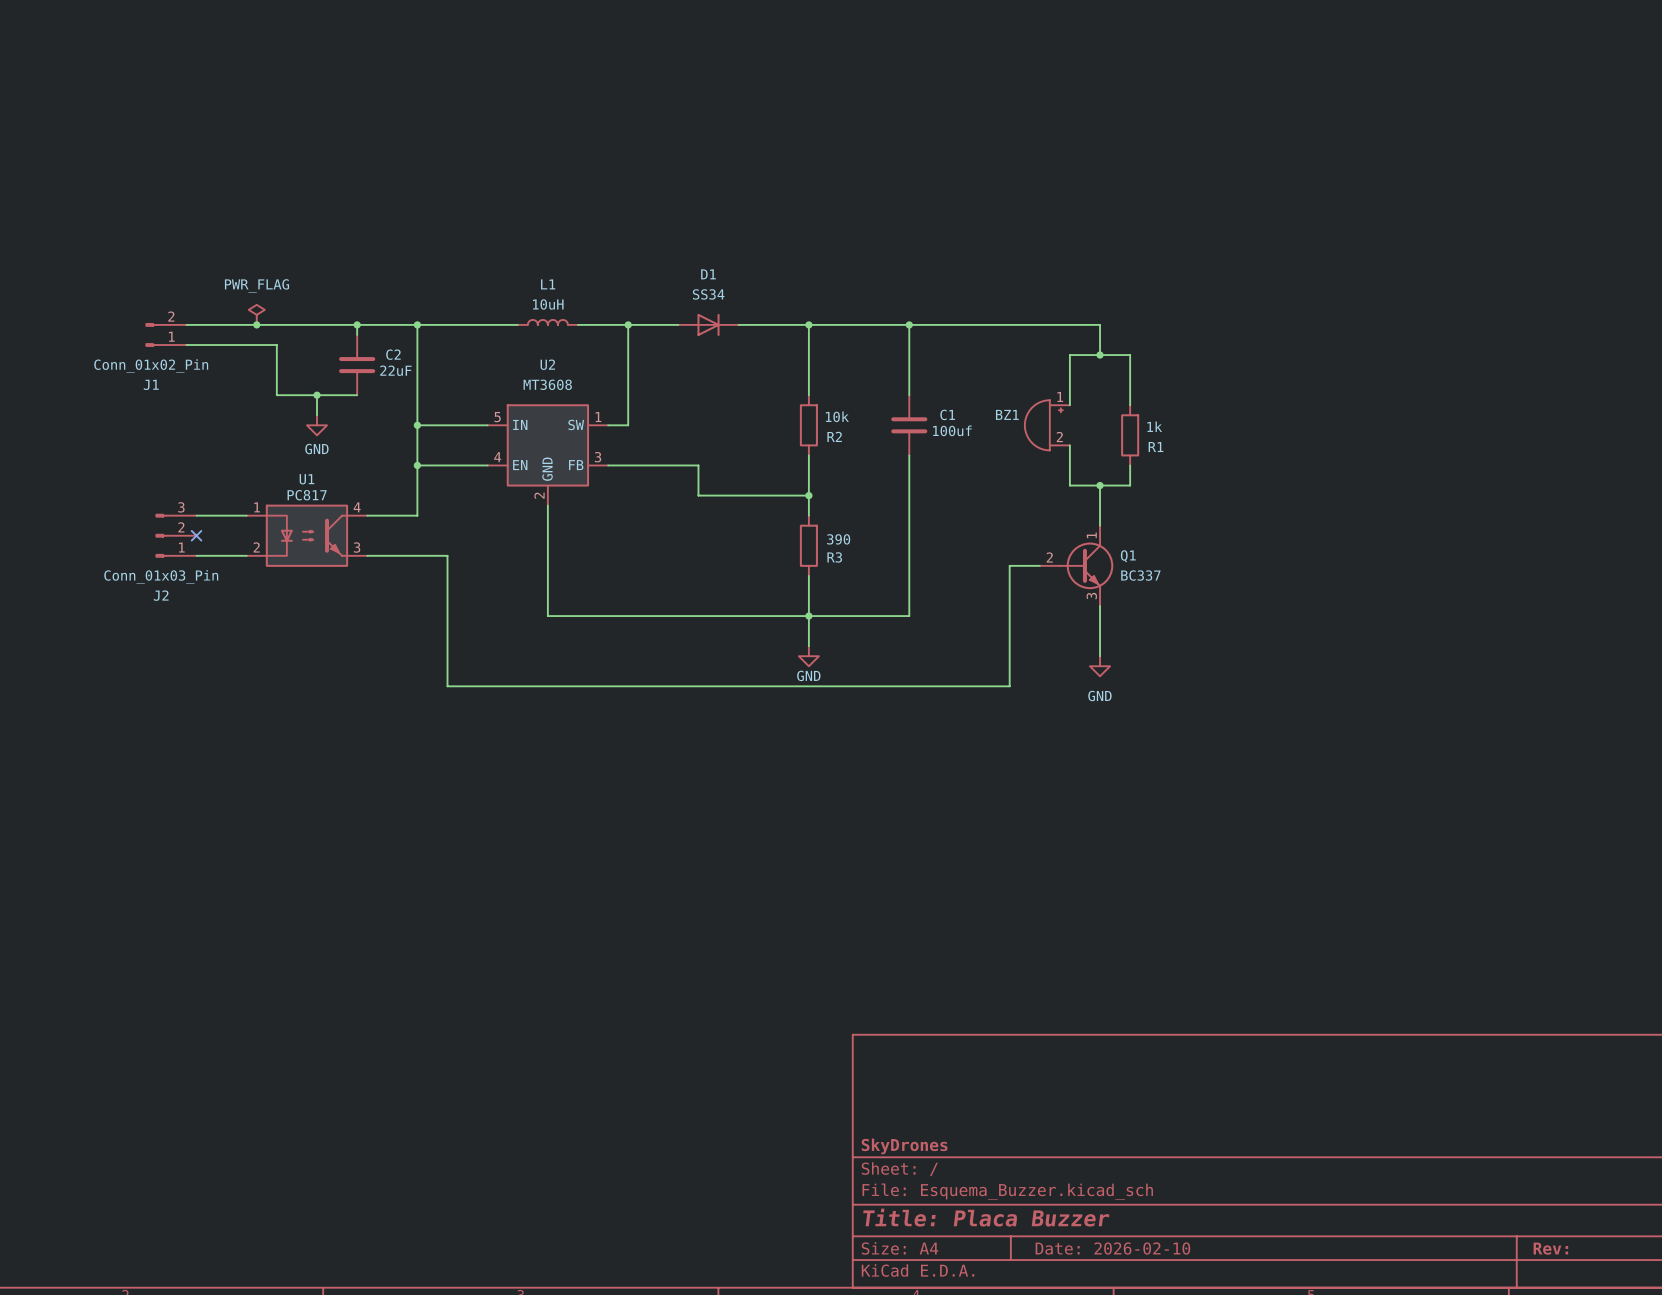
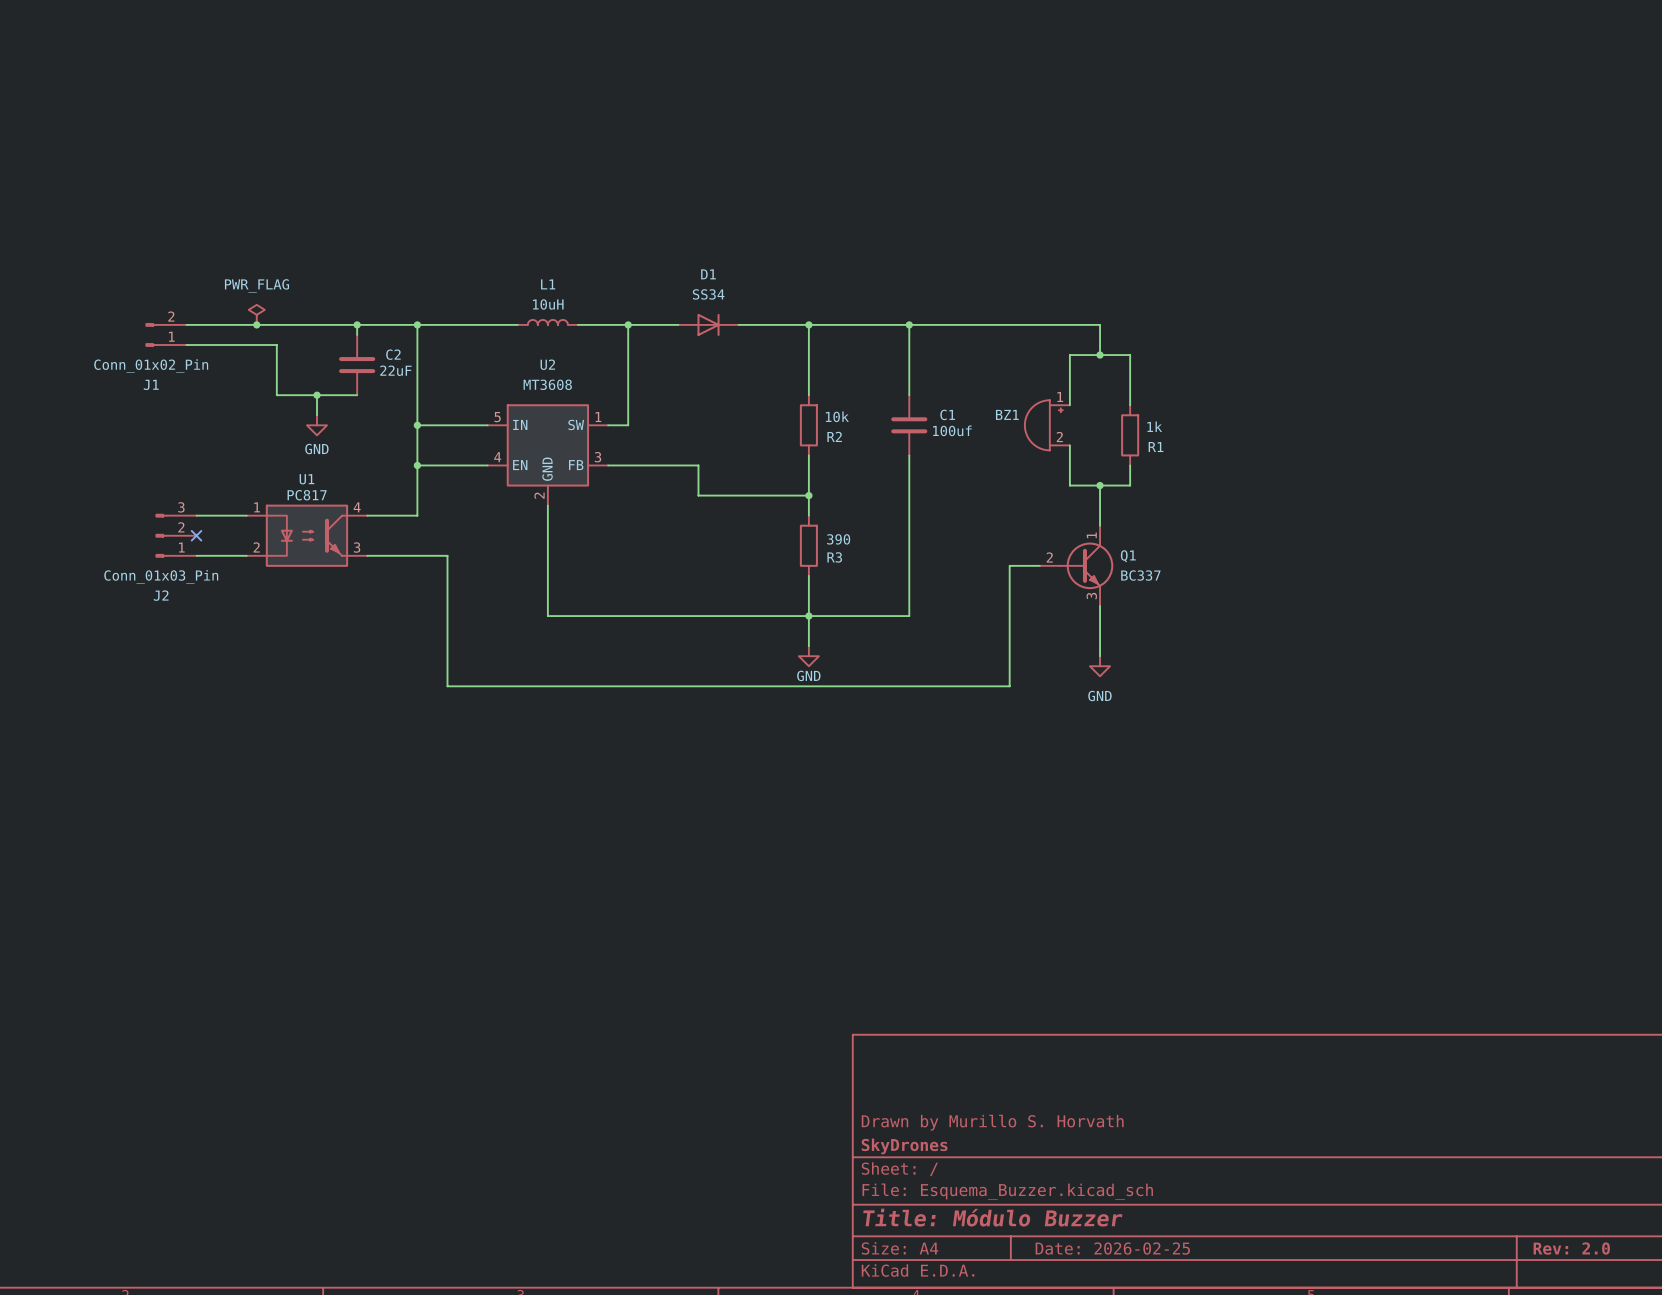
title block: none -> Drawn by Murillo S. Horvath (992, 1122)
title block: Title: Placa Buzzer (986, 1217) -> Title: Módulo Buzzer (992, 1217)
title block: Date: 2026-02-10 (1112, 1248) -> Date: 2026-02-25 (1112, 1248)
title block: Rev: (1550, 1248) -> Rev: 2.0 (1571, 1248)

